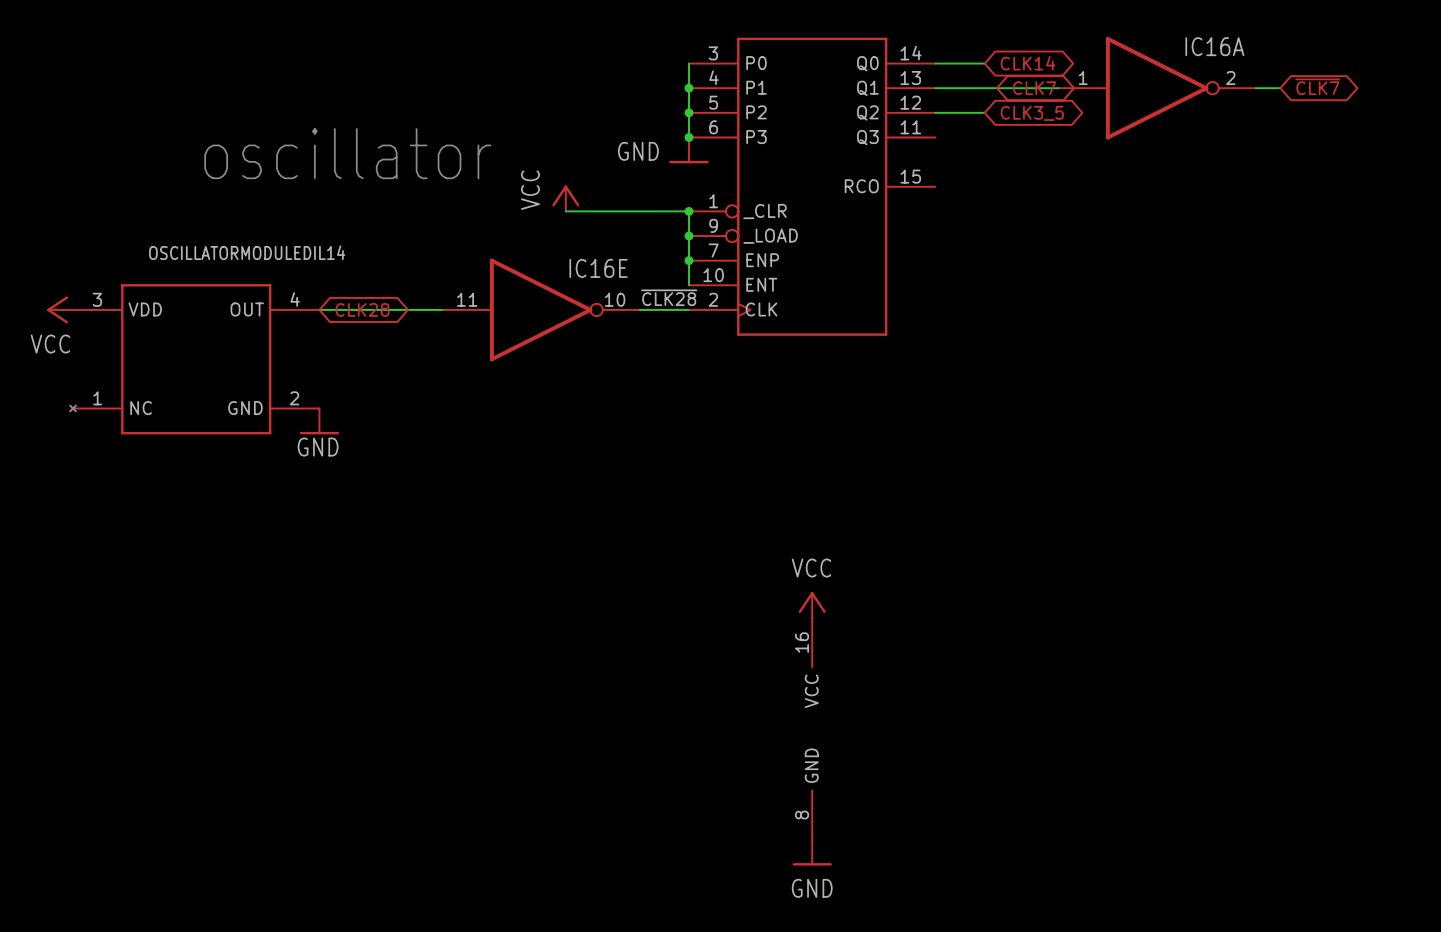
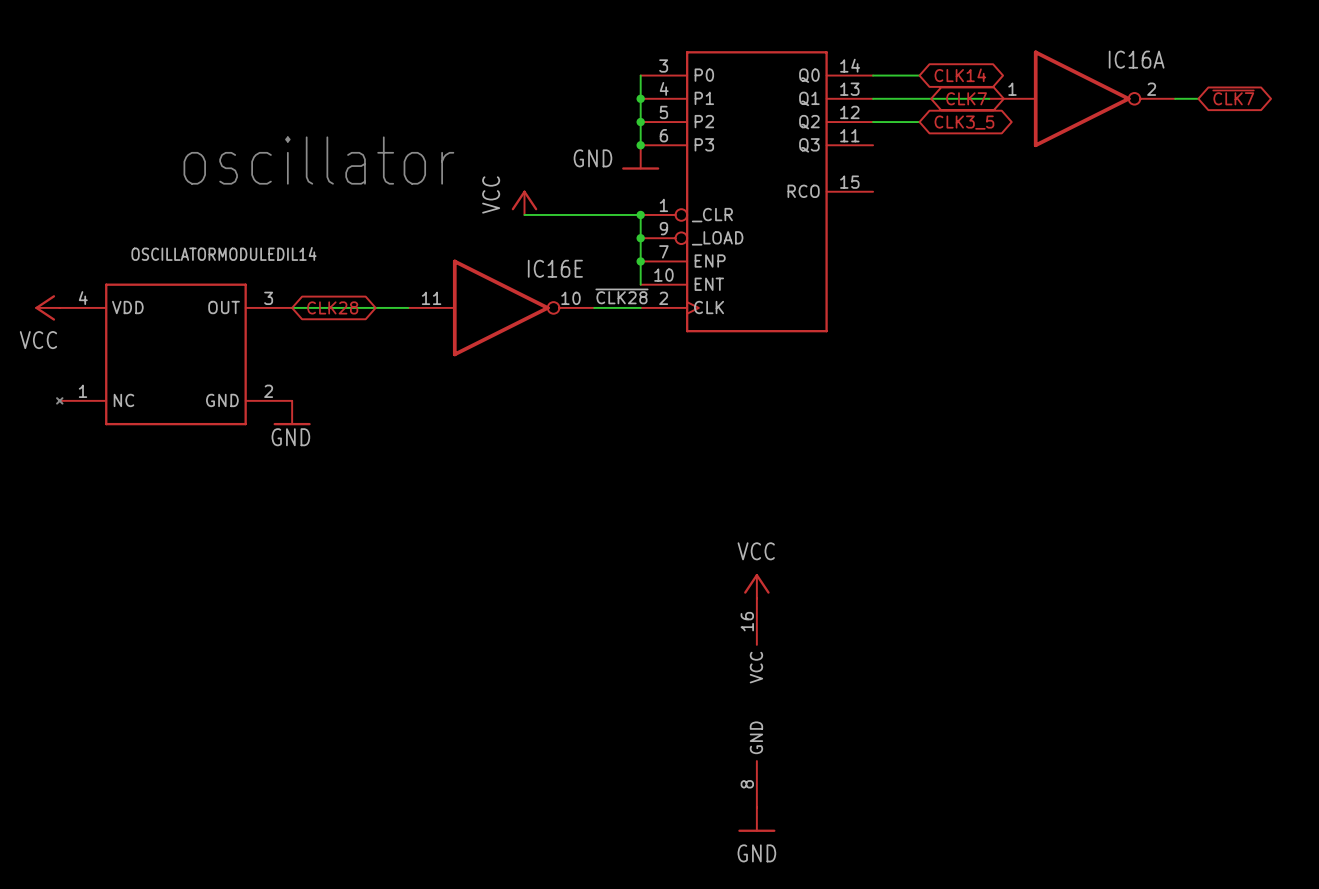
part pin number: 3 (97, 299) -> 4 (83, 298)
part pin number: 4 (295, 299) -> 3 (268, 298)

